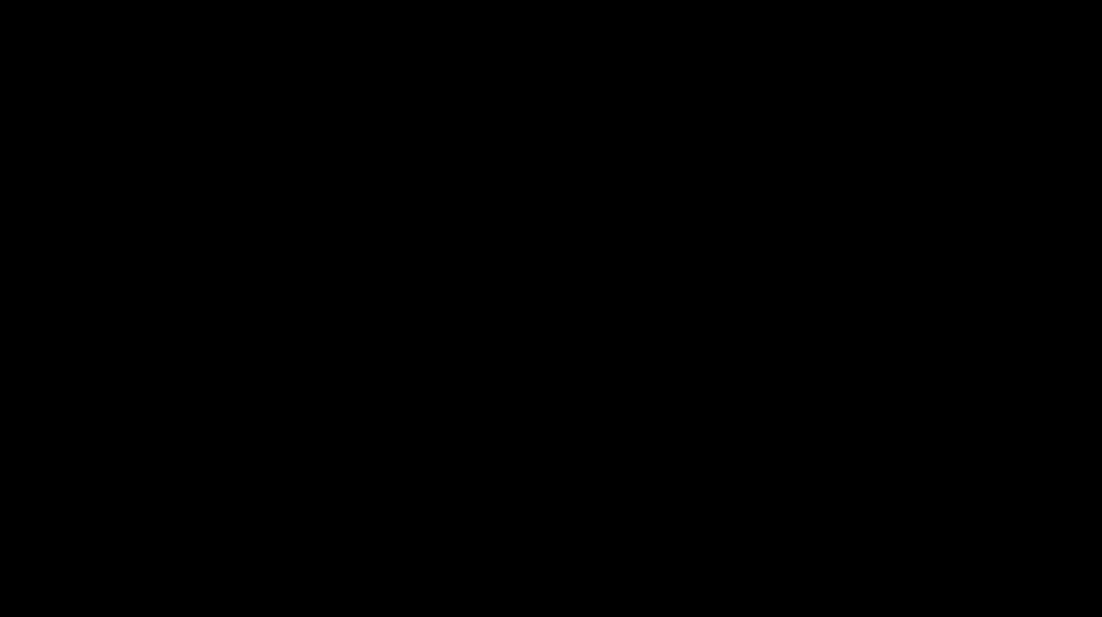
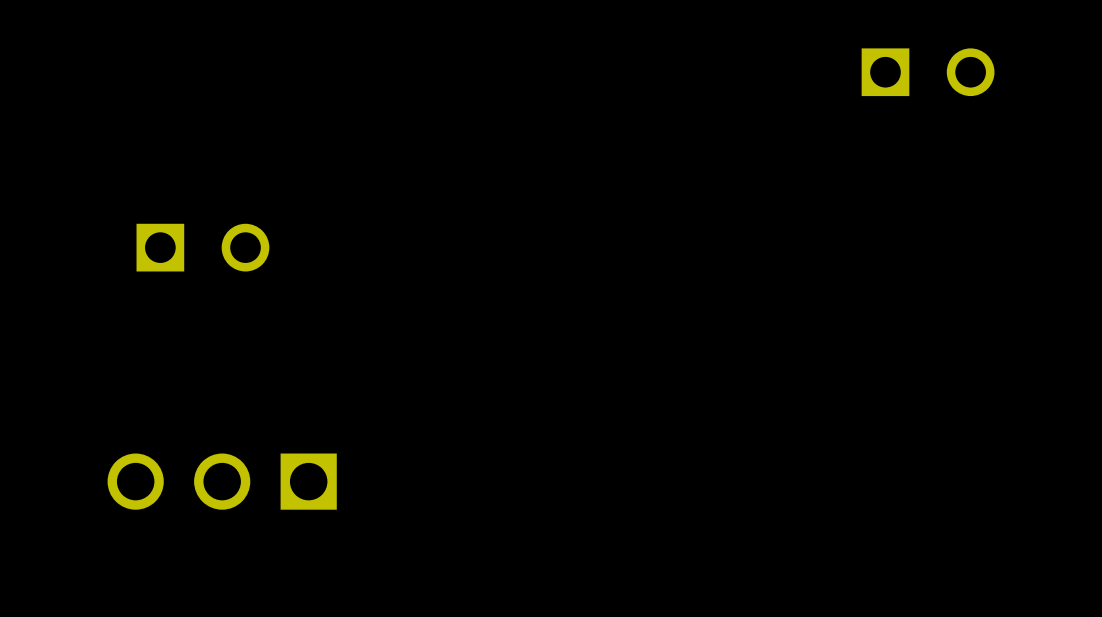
part: none -> (928, 72)
part: none -> (202, 247)
part: none -> (222, 481)

